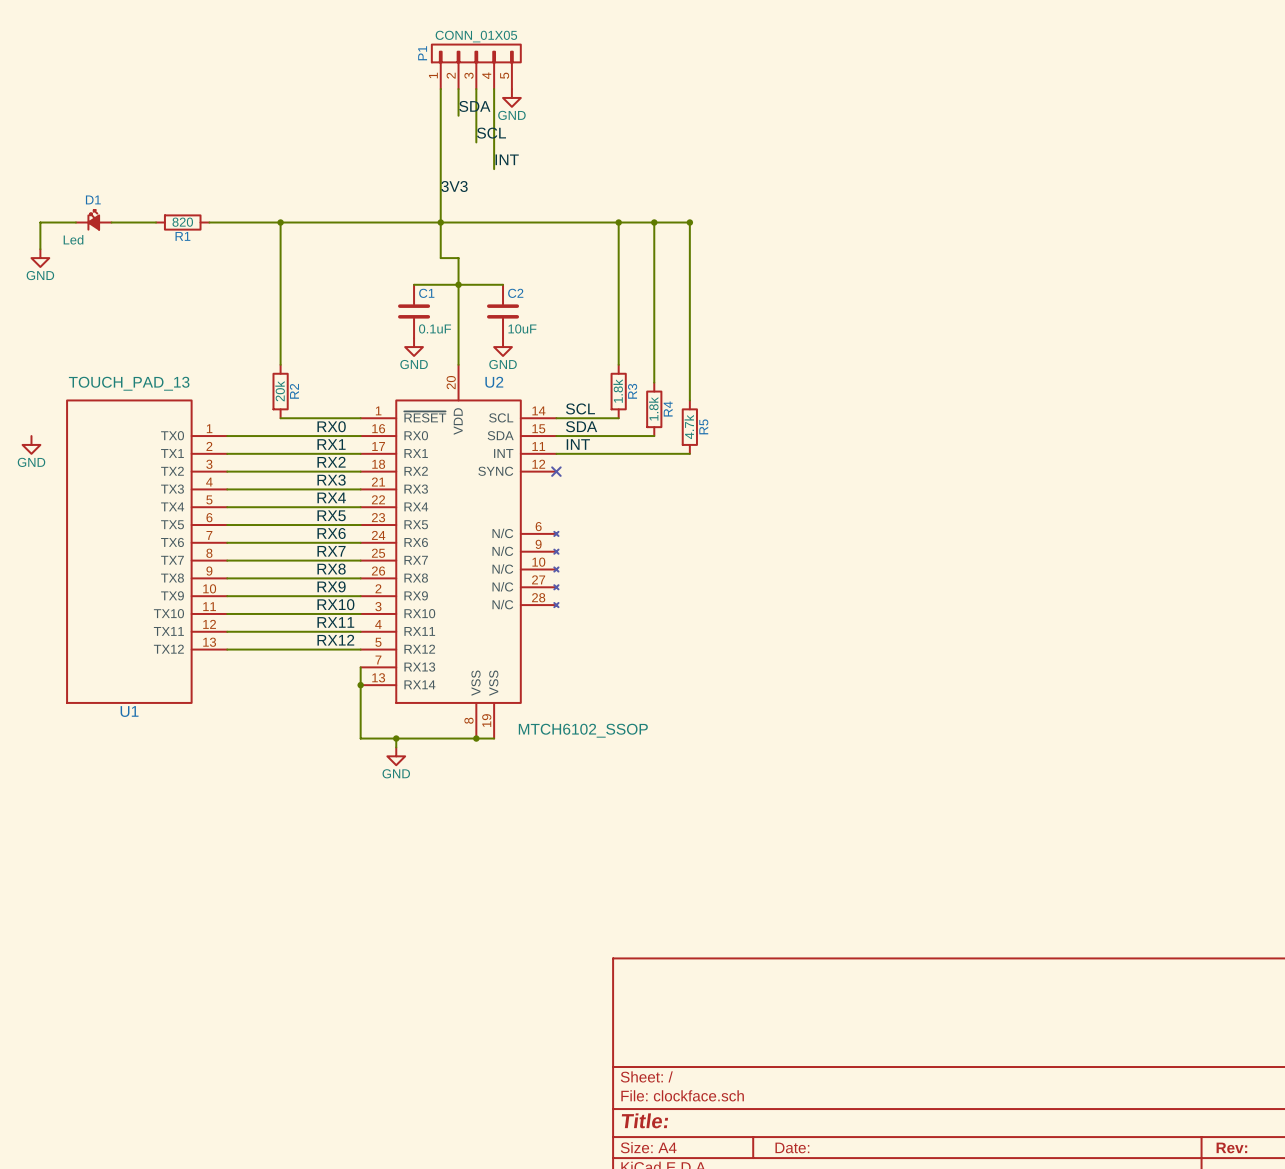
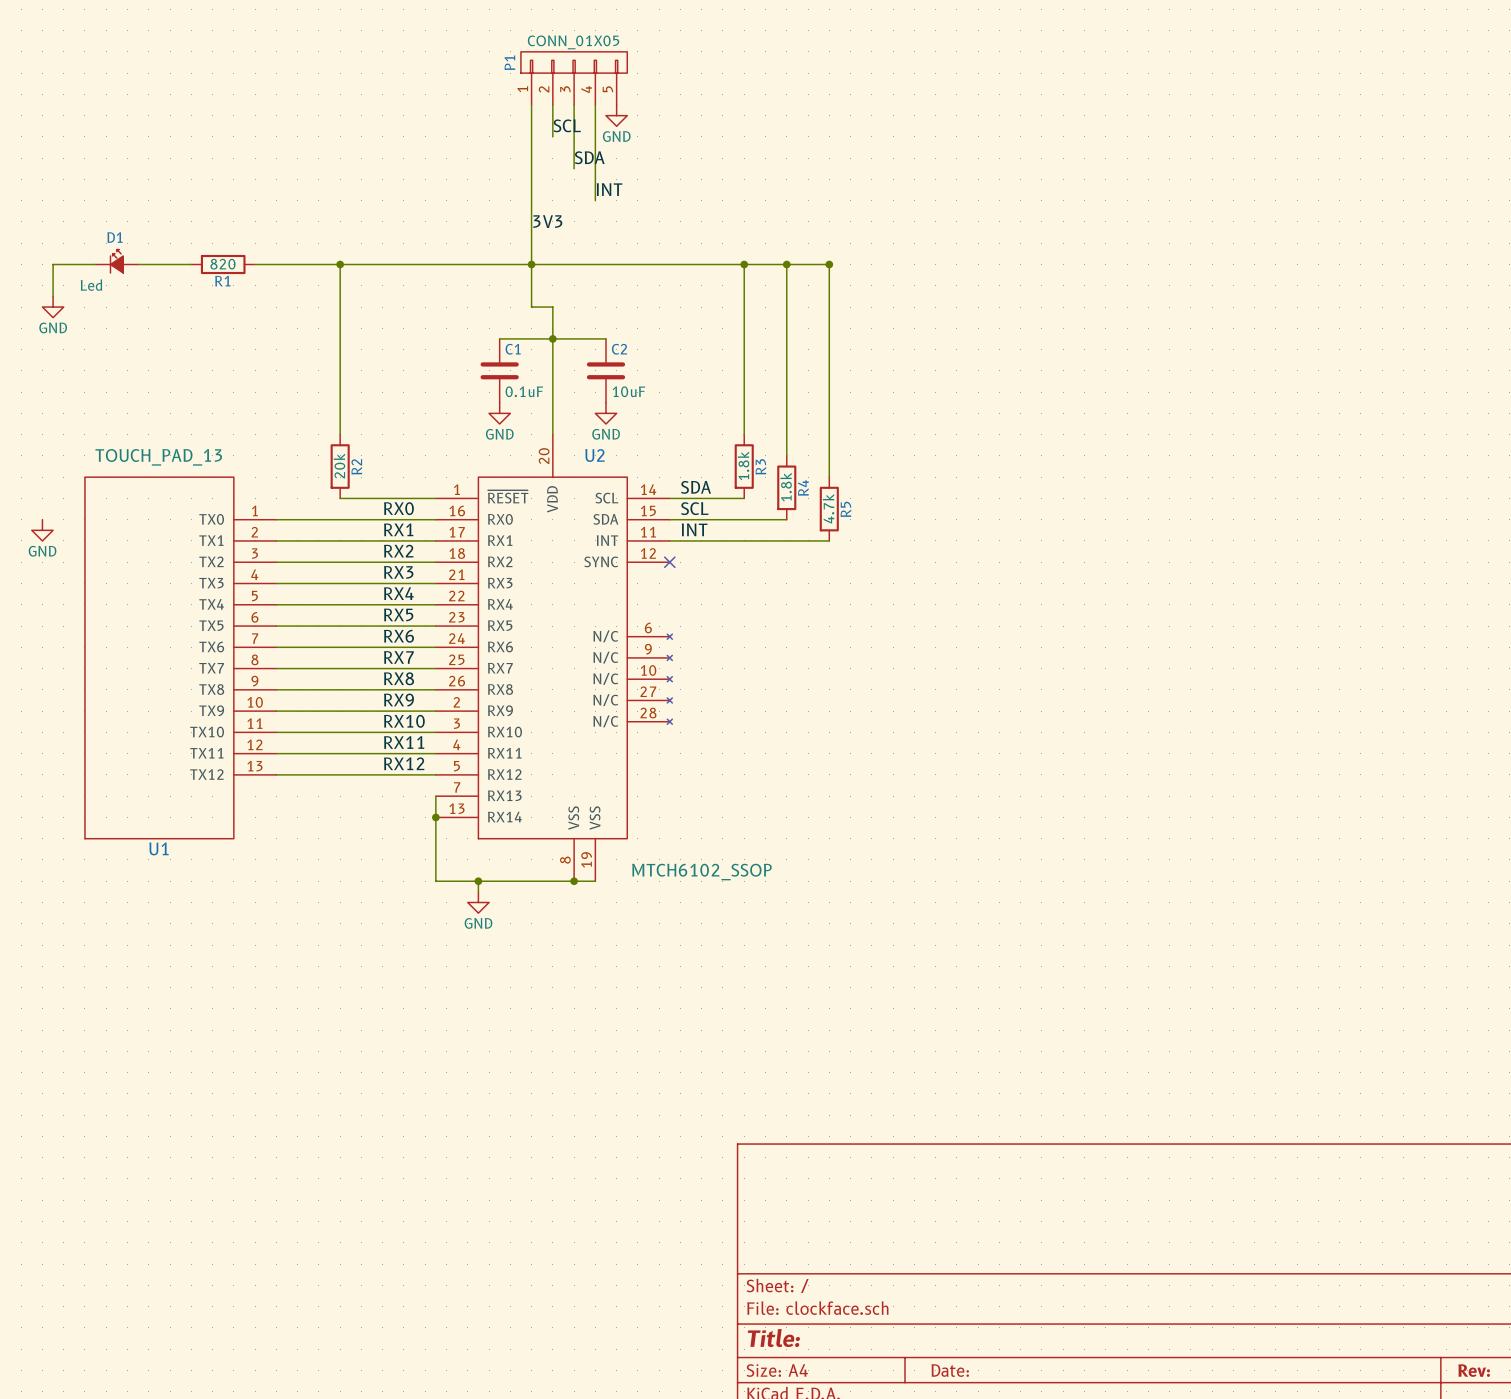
label: SDA (474, 106) -> SCL (567, 125)
label: SCL (491, 133) -> SDA (589, 157)
label: SCL (580, 408) -> SDA (696, 487)
label: SDA (581, 426) -> SCL (694, 508)

